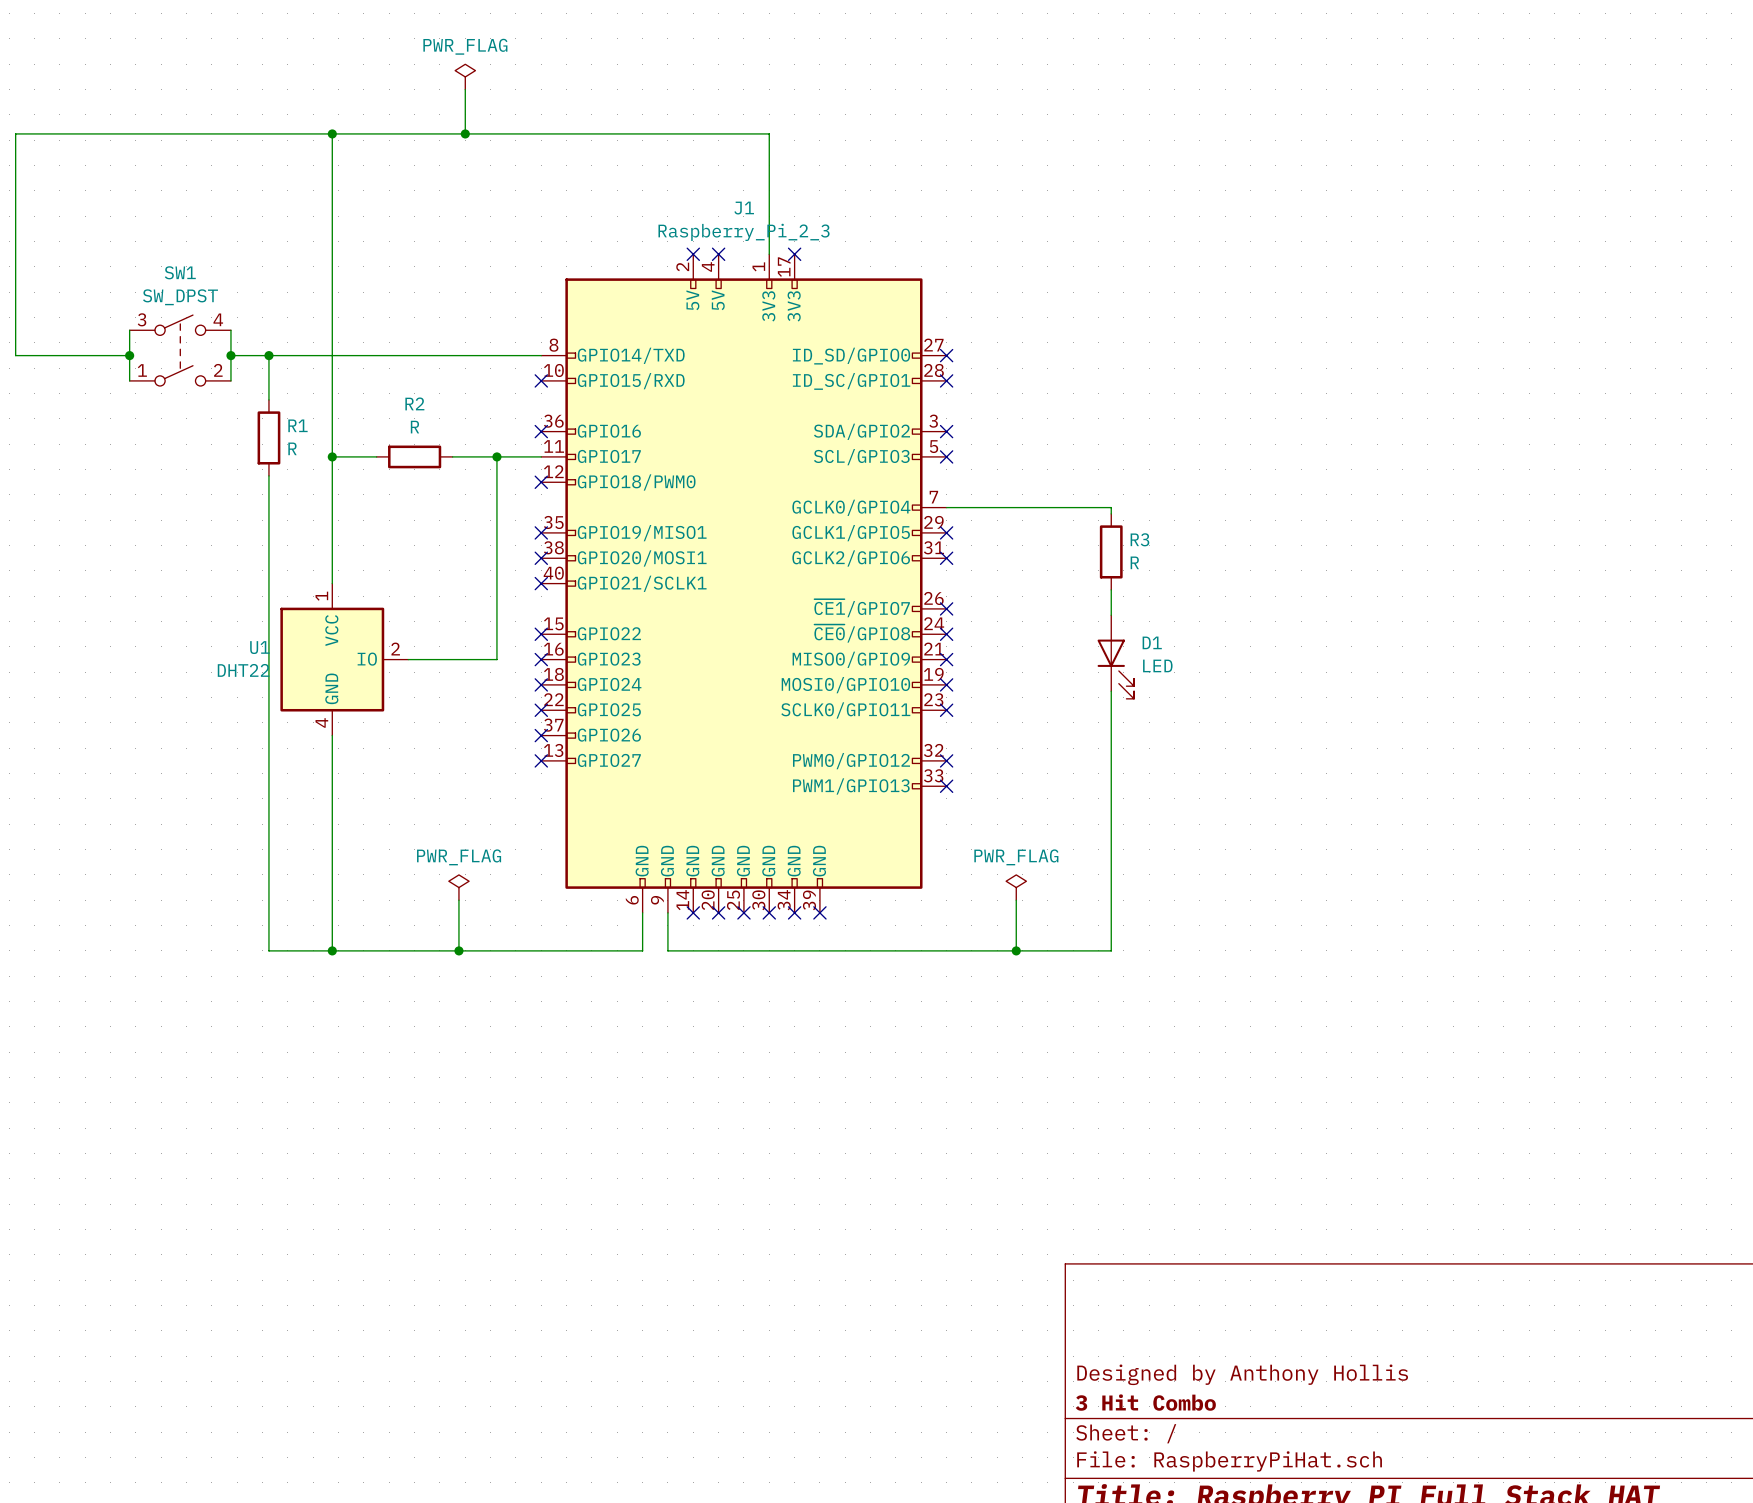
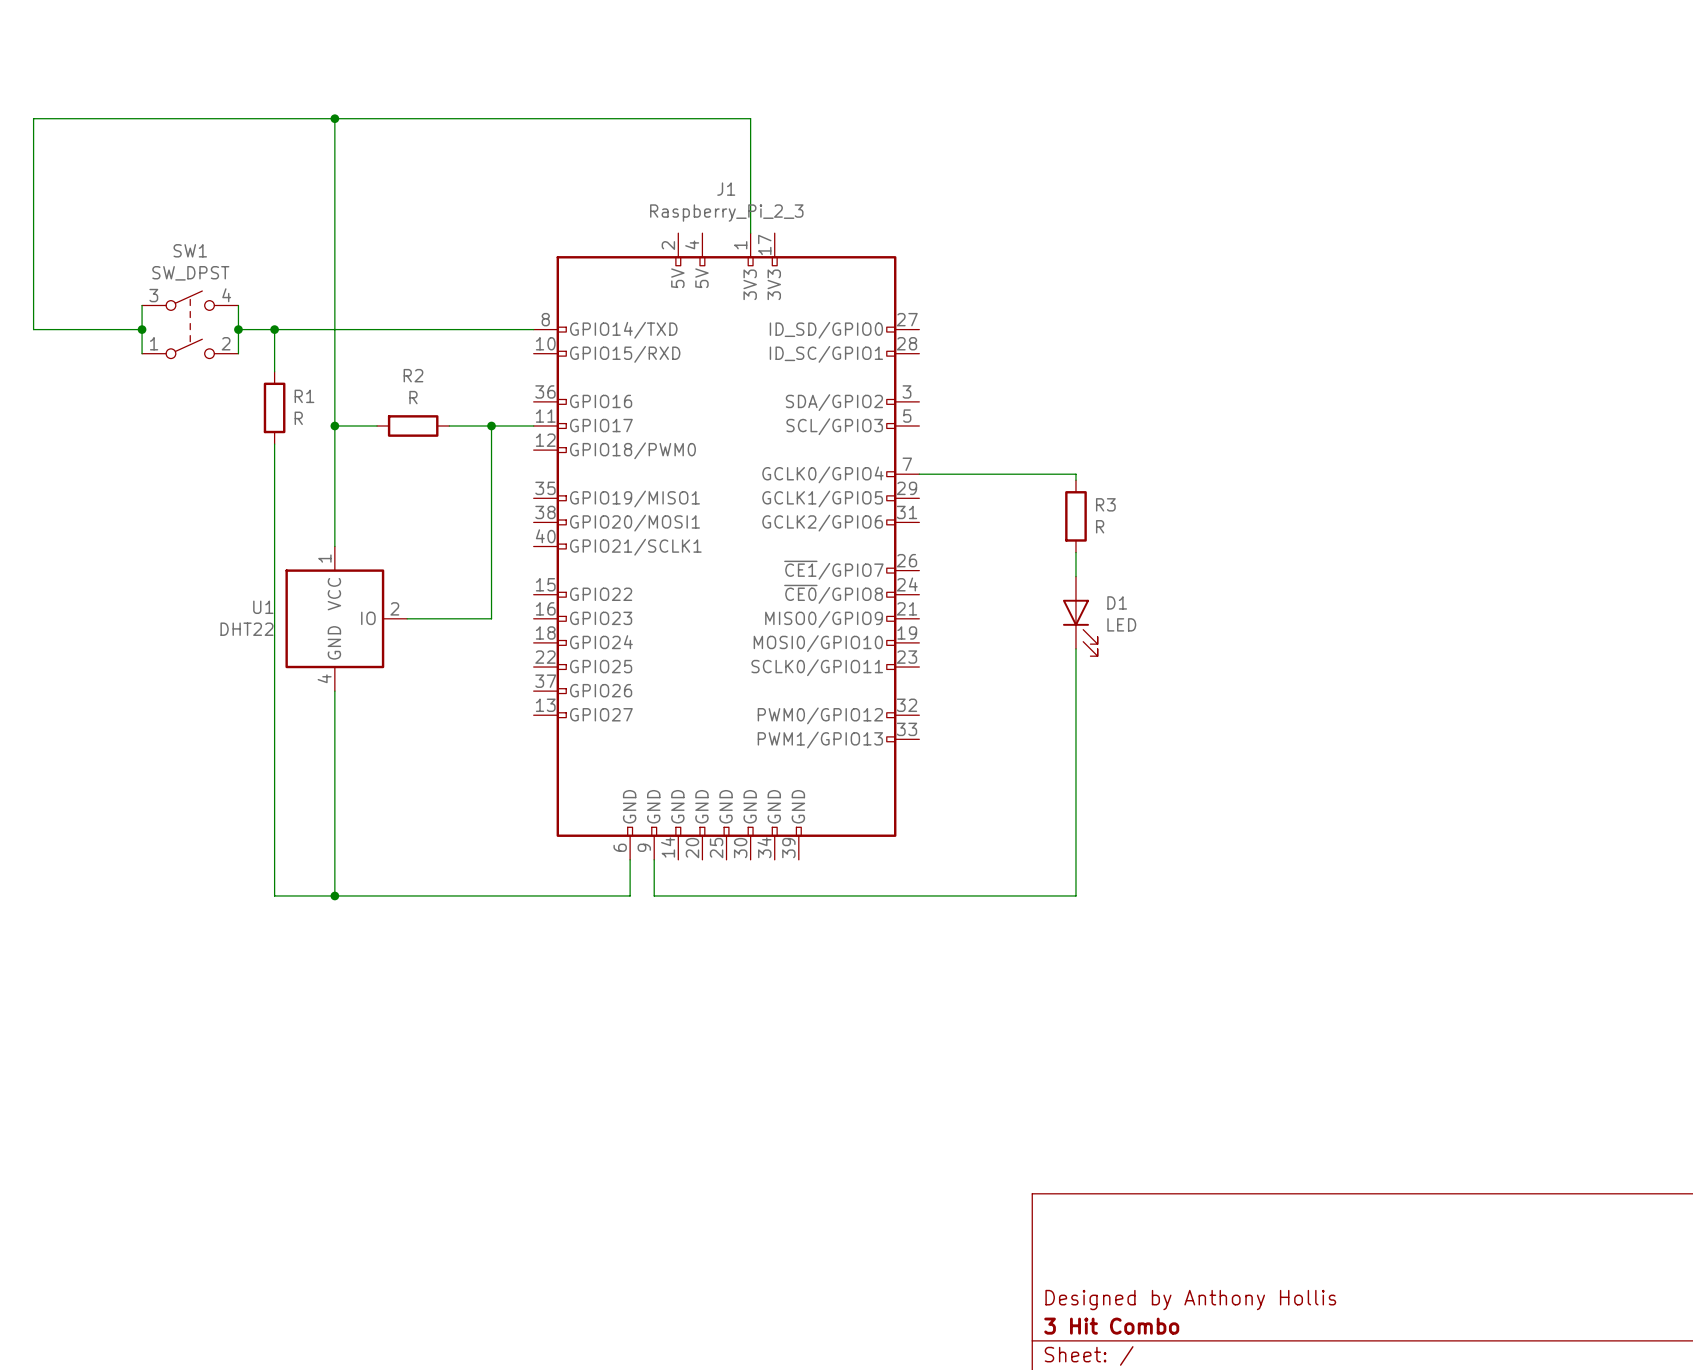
power symbol: PWR_FLAG (465, 76) -> none
wire: (465, 89) (465, 133) -> none
junction: (465, 133) -> none
no-connect mark: (693, 254) -> none
no-connect mark: (718, 254) -> none
no-connect mark: (794, 254) -> none
no-connect mark: (946, 355) -> none
no-connect mark: (541, 380) -> none
no-connect mark: (946, 380) -> none
no-connect mark: (541, 431) -> none
no-connect mark: (946, 431) -> none
no-connect mark: (946, 456) -> none
no-connect mark: (541, 482) -> none
no-connect mark: (541, 532) -> none
no-connect mark: (946, 532) -> none
no-connect mark: (541, 558) -> none
no-connect mark: (946, 558) -> none
no-connect mark: (541, 583) -> none
no-connect mark: (946, 608) -> none
no-connect mark: (541, 634) -> none
no-connect mark: (946, 634) -> none
no-connect mark: (541, 659) -> none
no-connect mark: (946, 659) -> none
no-connect mark: (541, 684) -> none
no-connect mark: (946, 684) -> none
no-connect mark: (541, 710) -> none
no-connect mark: (946, 710) -> none
no-connect mark: (541, 735) -> none
no-connect mark: (541, 760) -> none
no-connect mark: (946, 760) -> none
no-connect mark: (946, 786) -> none
power symbol: PWR_FLAG (458, 887) -> none
power symbol: PWR_FLAG (1016, 887) -> none
wire: (458, 900) (458, 950) -> none
wire: (1016, 900) (1016, 950) -> none
no-connect mark: (693, 912) -> none
no-connect mark: (718, 912) -> none
no-connect mark: (743, 912) -> none
no-connect mark: (769, 912) -> none
no-connect mark: (794, 912) -> none
no-connect mark: (819, 912) -> none
junction: (458, 950) -> none
junction: (1016, 950) -> none

